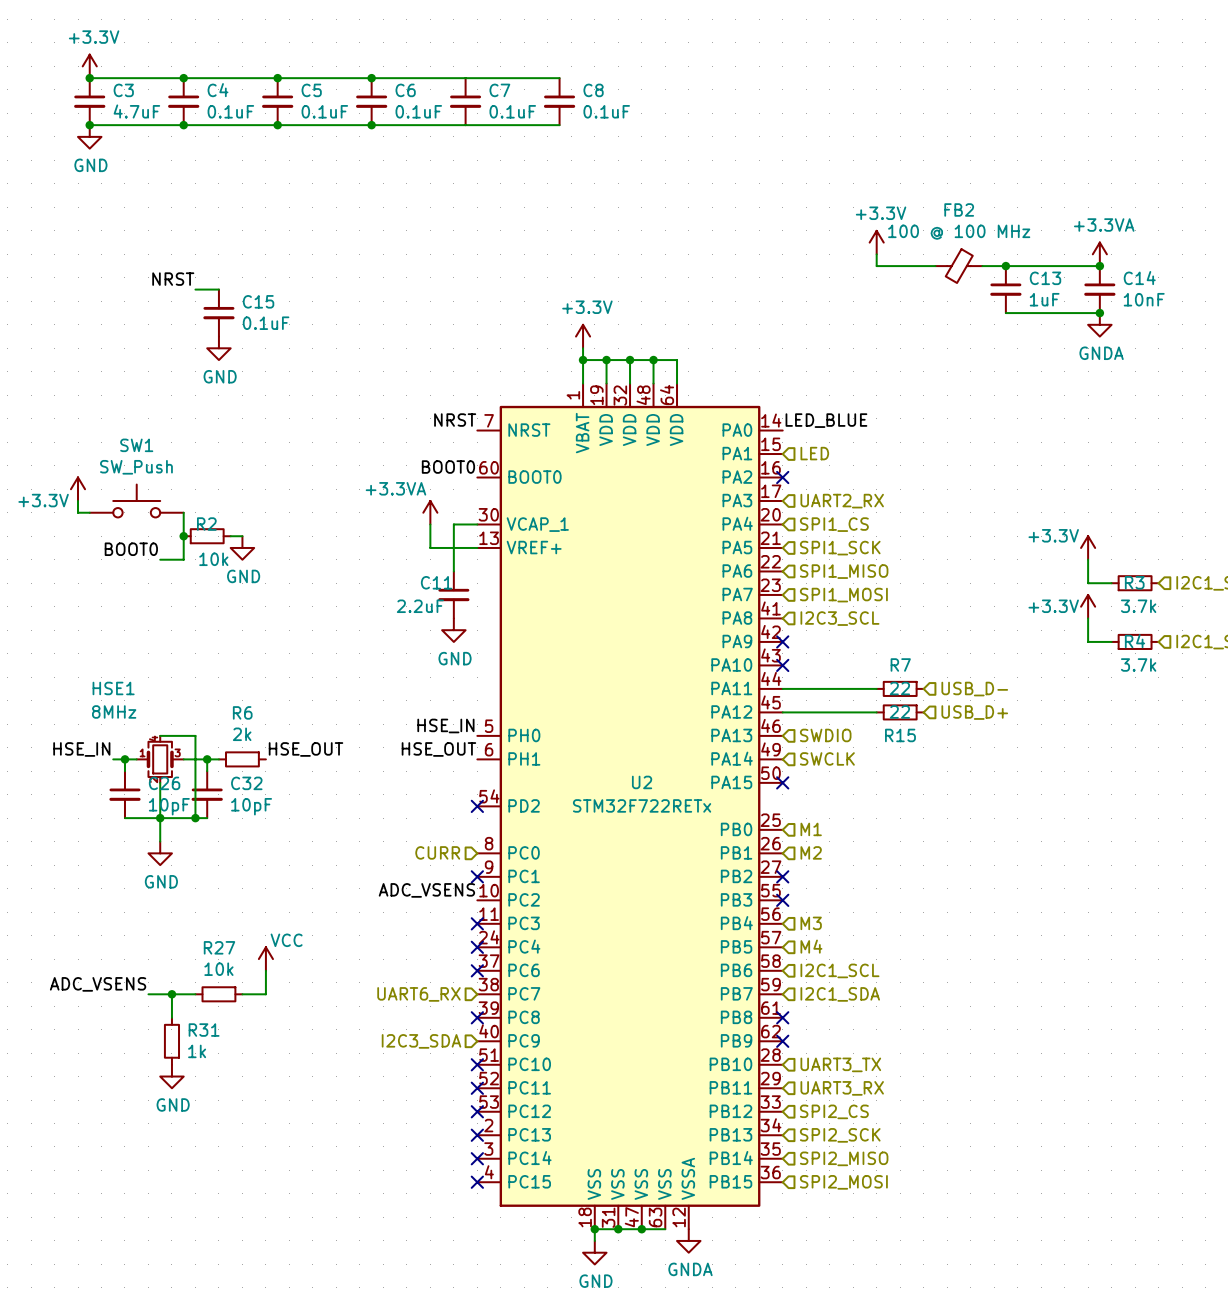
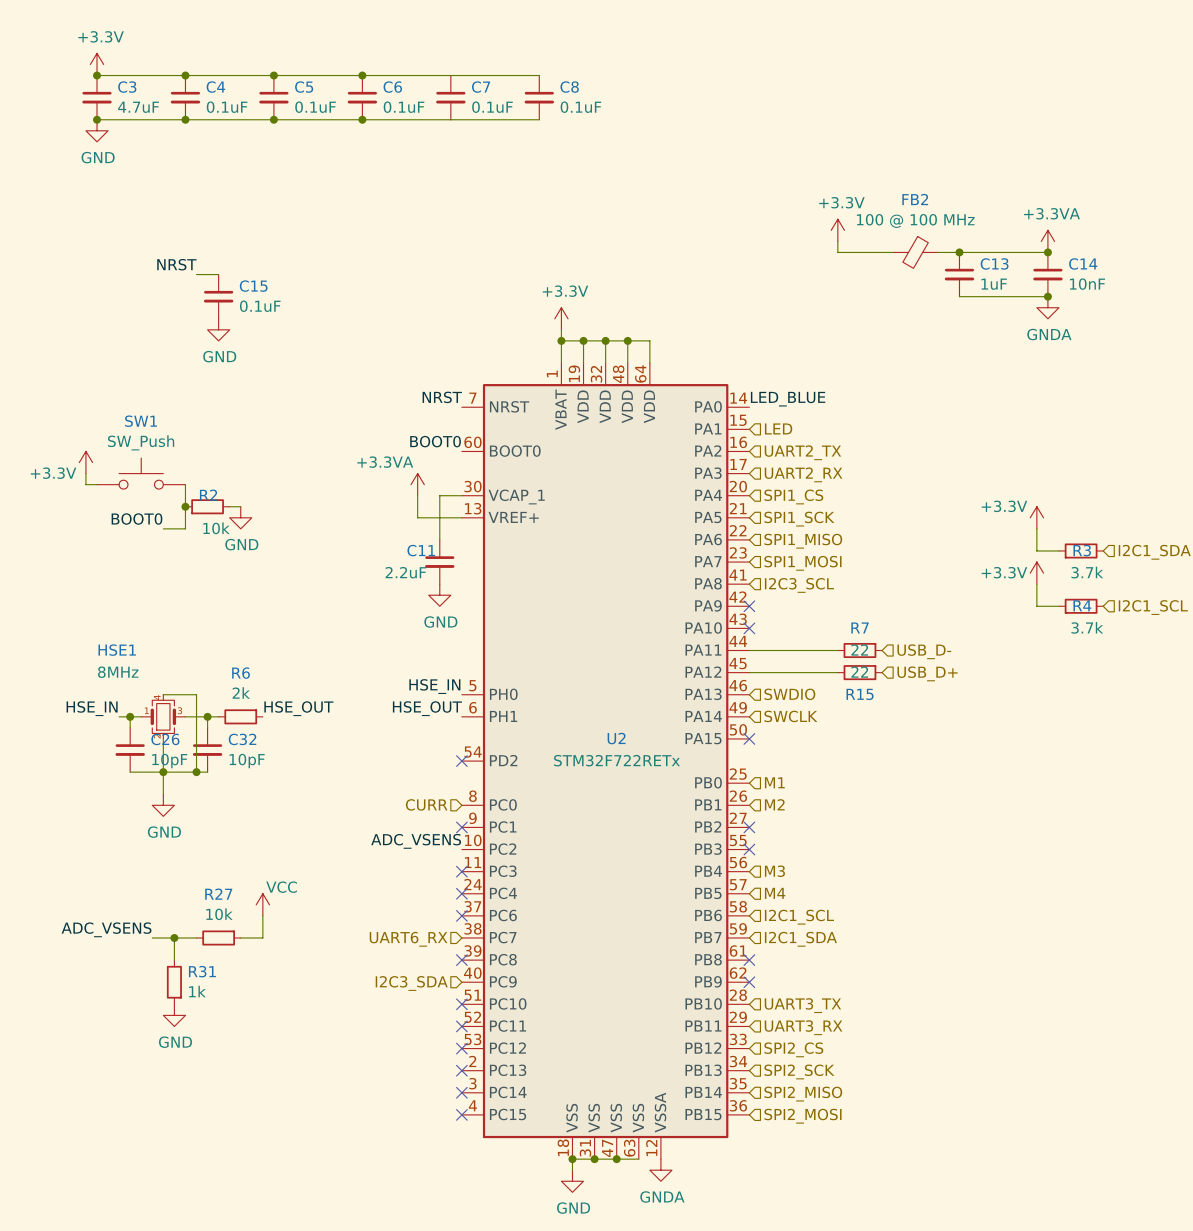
no-connect mark: (782, 477) -> none
hierarchical label: none -> UART2_TX (802, 452)

